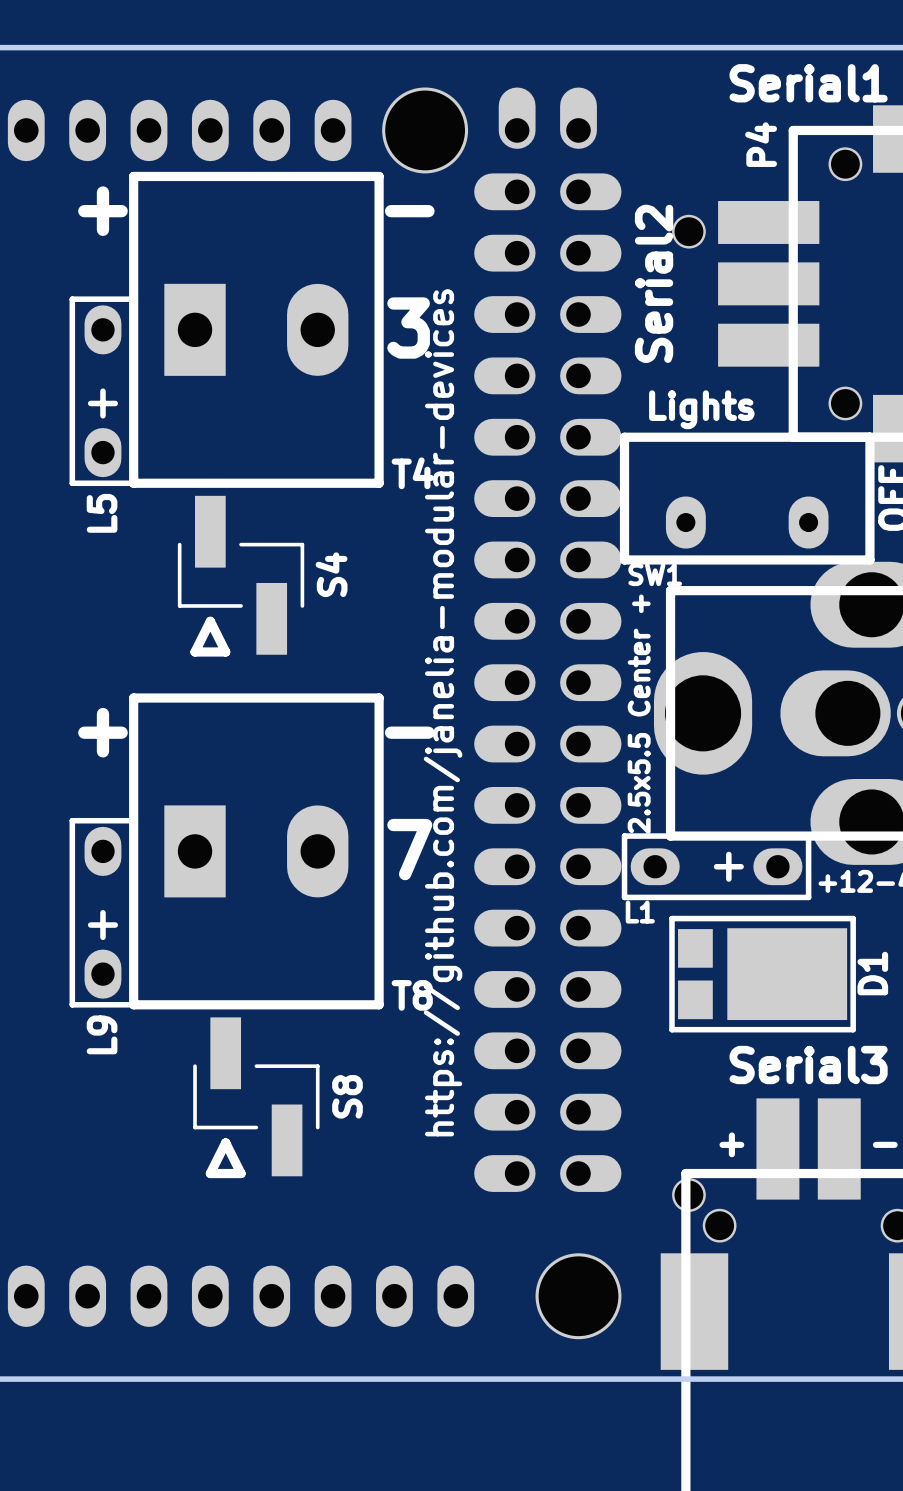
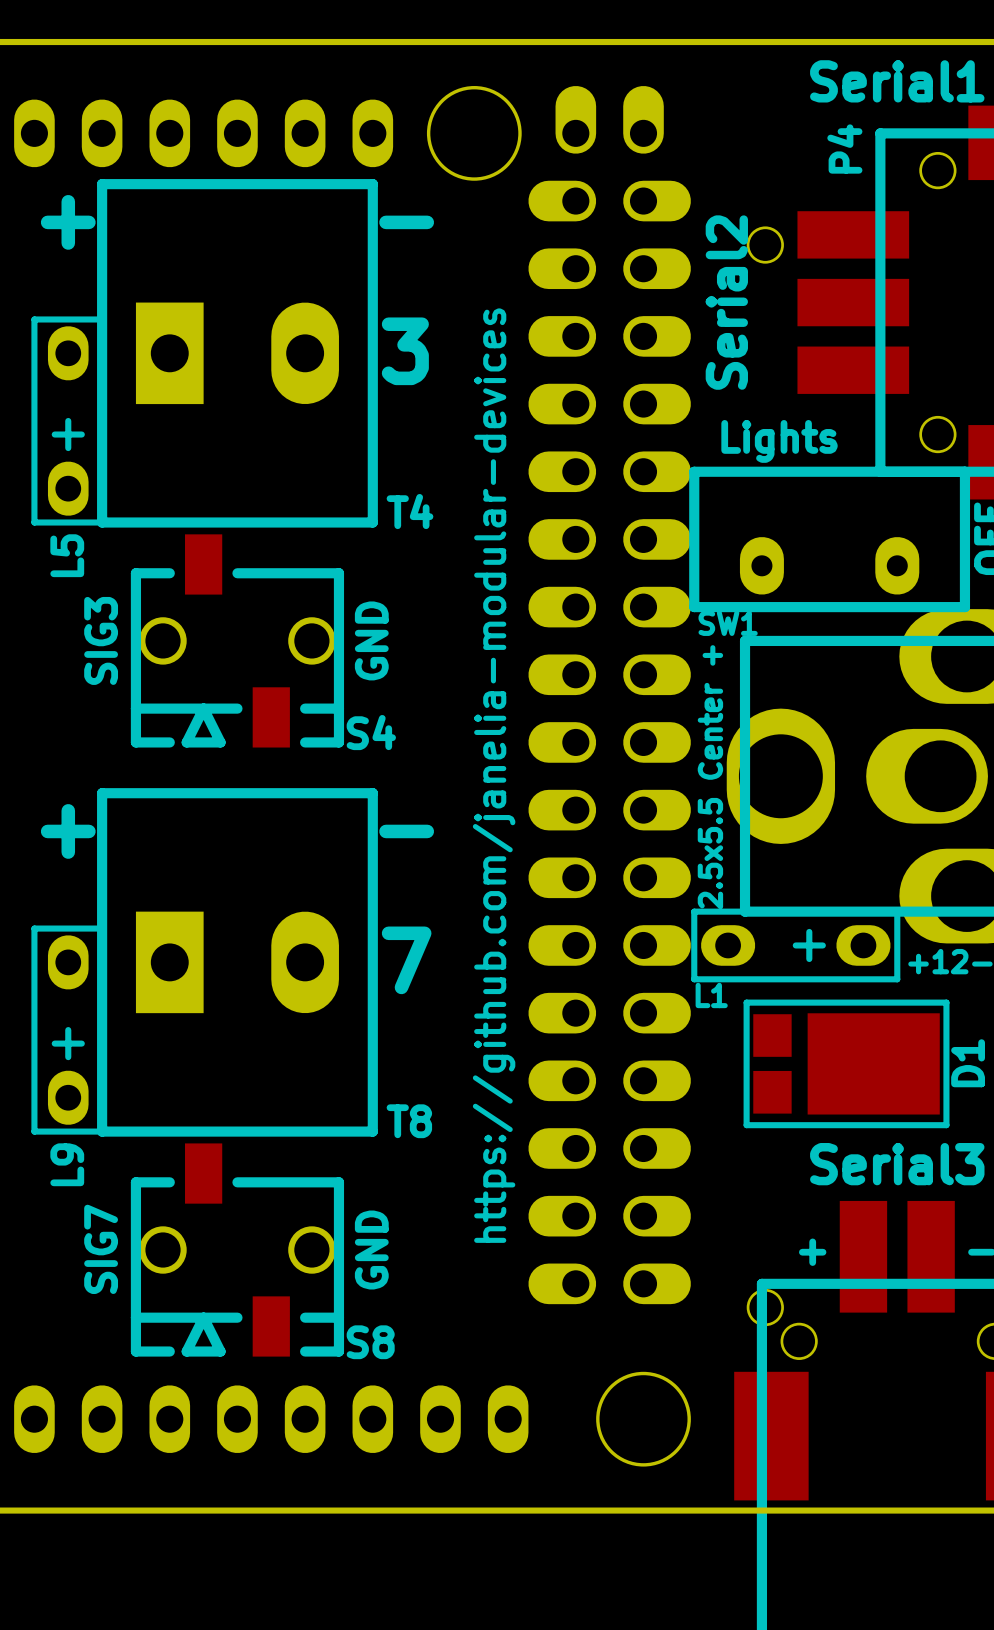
text position: + (102, 211) -> + (68, 222)
text position: - (409, 211) -> - (406, 222)
text position: 3 (408, 328) -> 3 (405, 351)
T4 position: (256, 329) -> (237, 353)
L5 position: (102, 391) -> (68, 420)
S4 footprint: [177, 495, 305, 657] -> [130, 534, 345, 748]
S4 name position: S4 (331, 574) -> S4 (371, 732)
text: none -> SIG3 (101, 640)
text: none -> GND (371, 640)
text position: + (102, 732) -> + (68, 831)
text position: - (409, 732) -> - (406, 831)
text position: 7 (409, 849) -> 7 (406, 960)
T8 position: (256, 851) -> (237, 962)
L9 position: (102, 912) -> (68, 1030)
S8 footprint: [193, 1017, 320, 1179] -> [130, 1143, 345, 1357]
S8 name position: S8 (347, 1096) -> S8 (370, 1342)
text: none -> SIG7 (101, 1249)
text: none -> GND (371, 1250)

